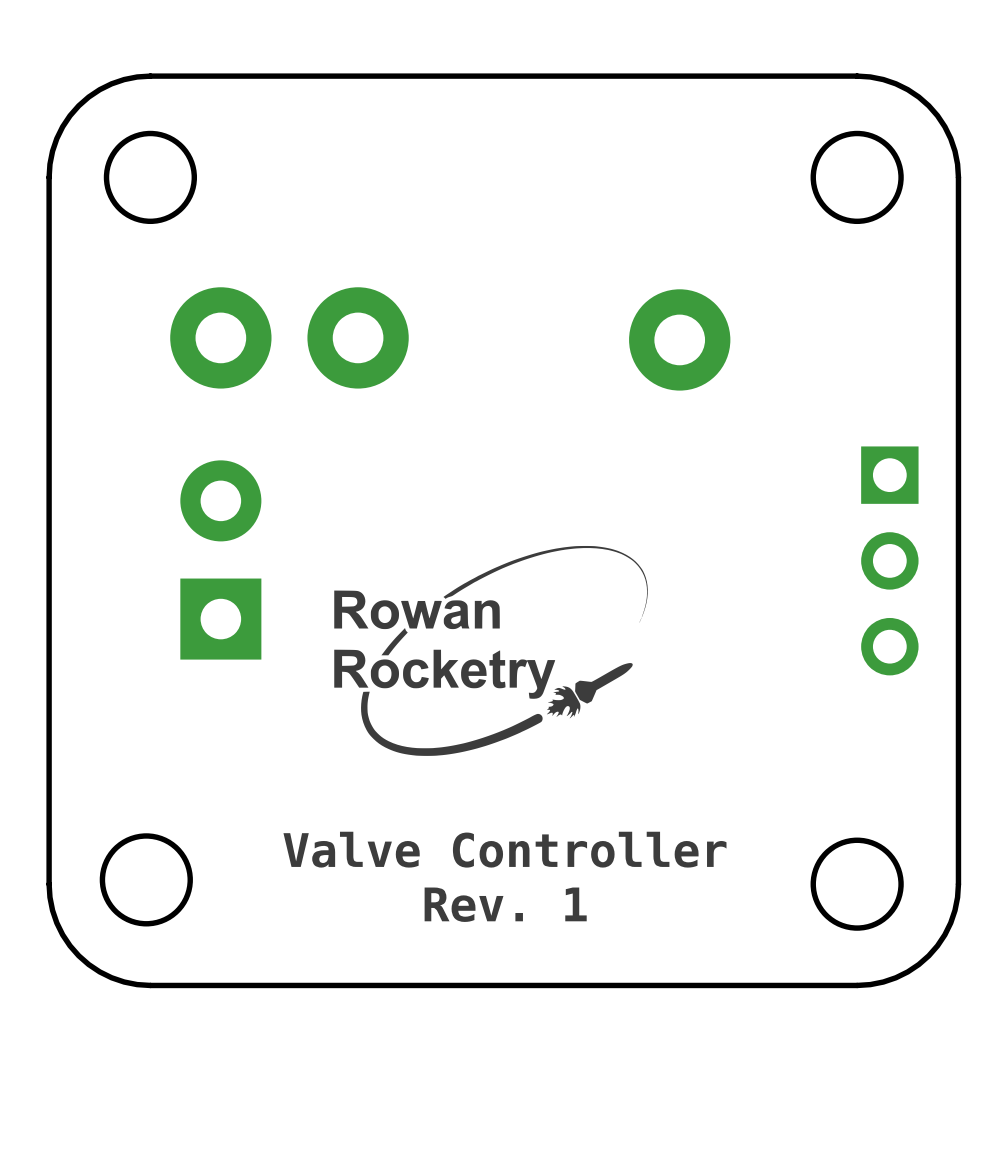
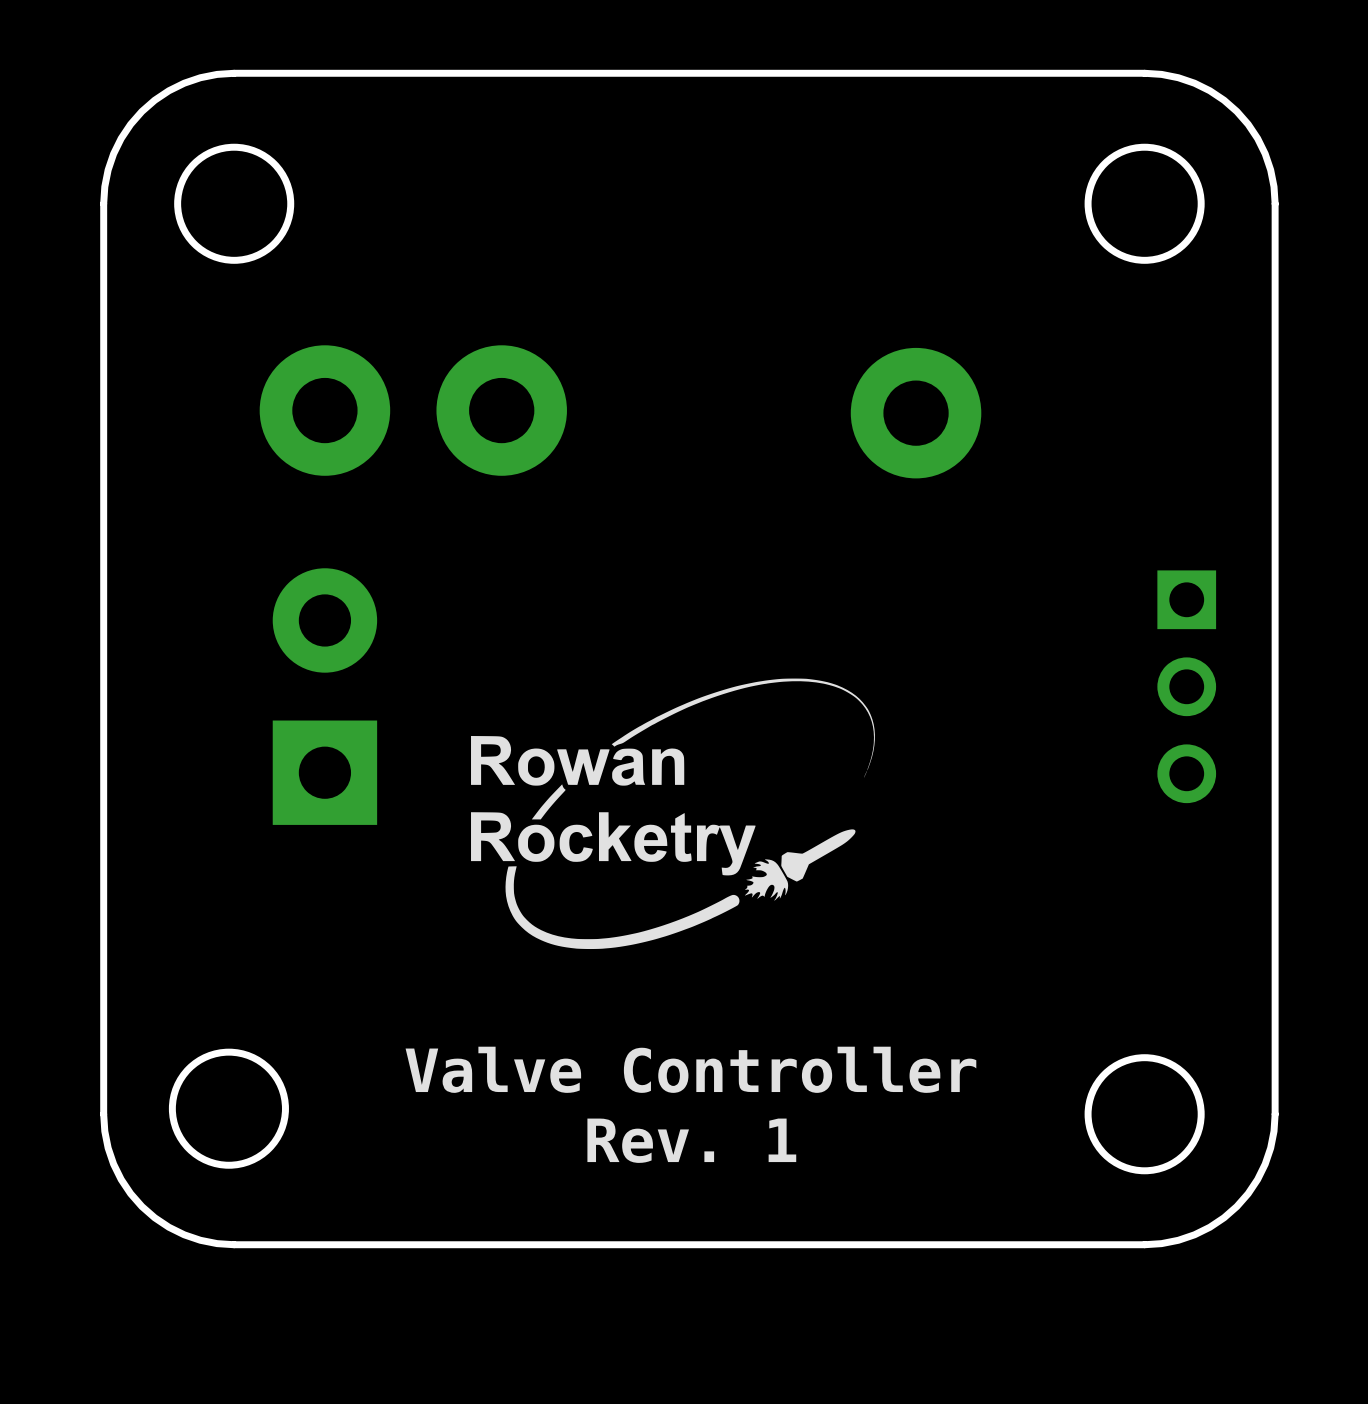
part footprint: [861, 446, 919, 676] -> [1157, 570, 1217, 804]

